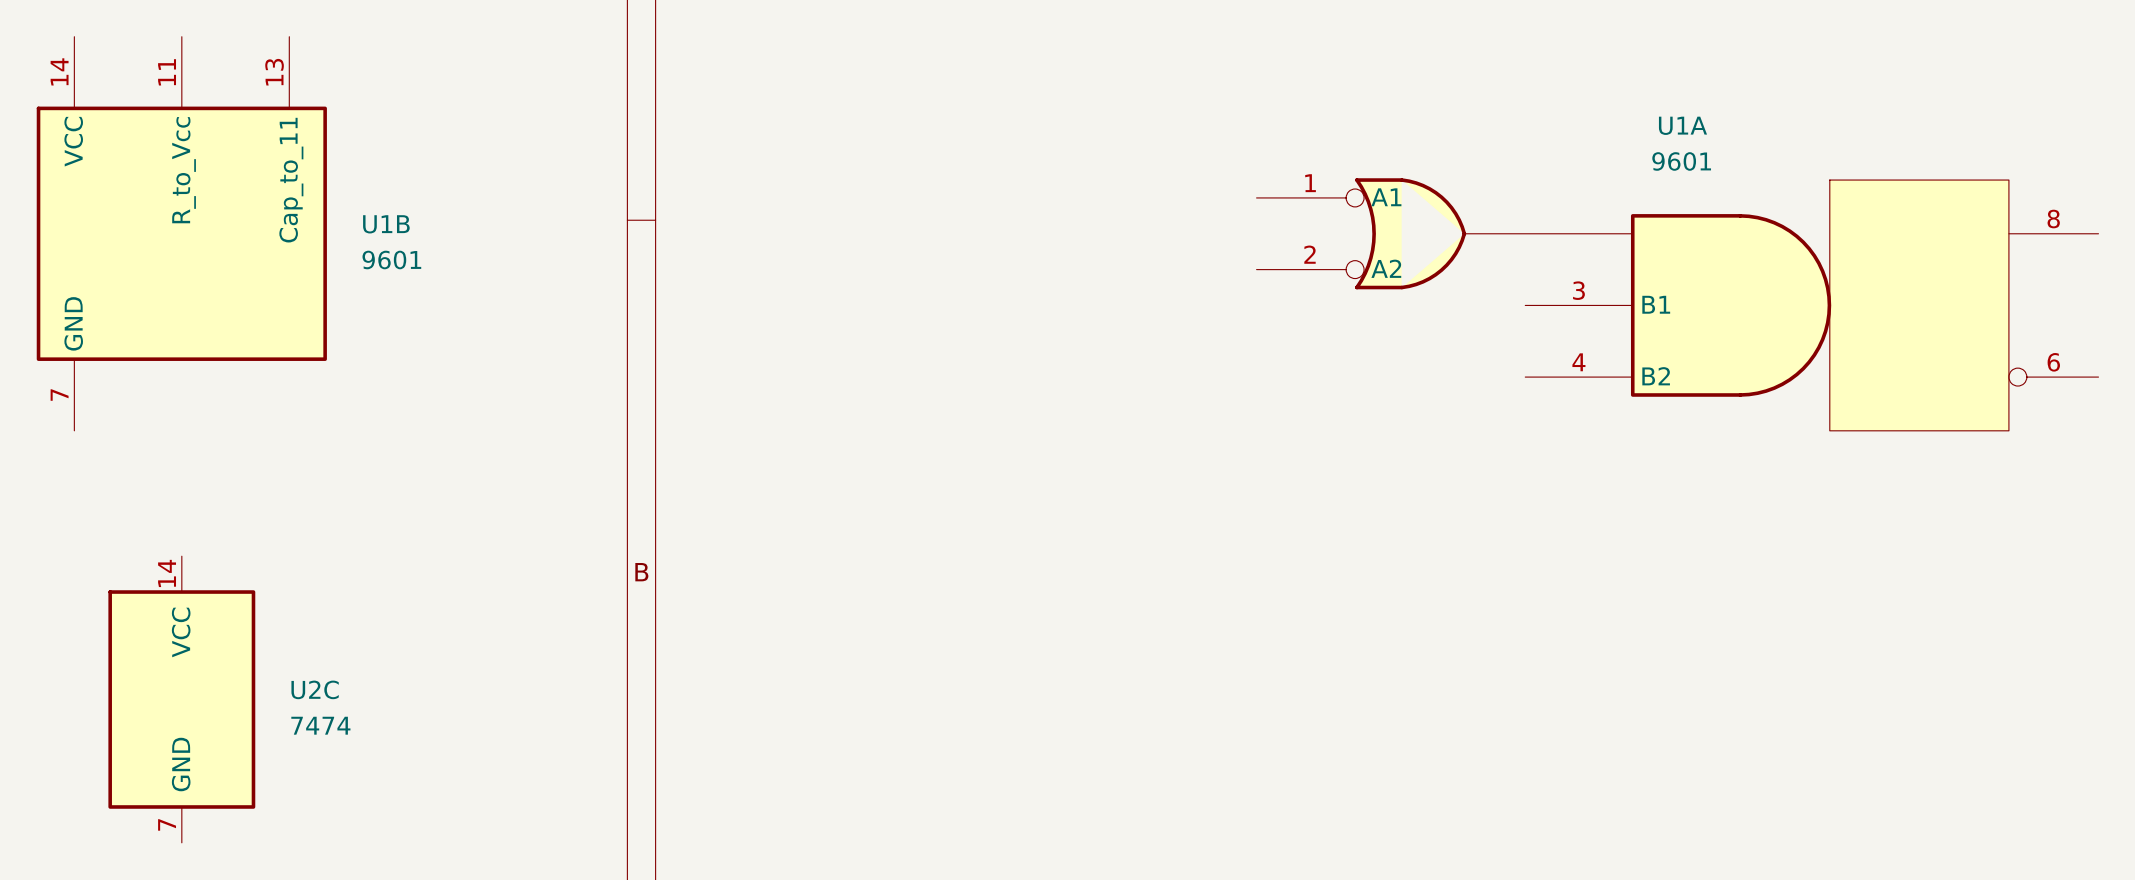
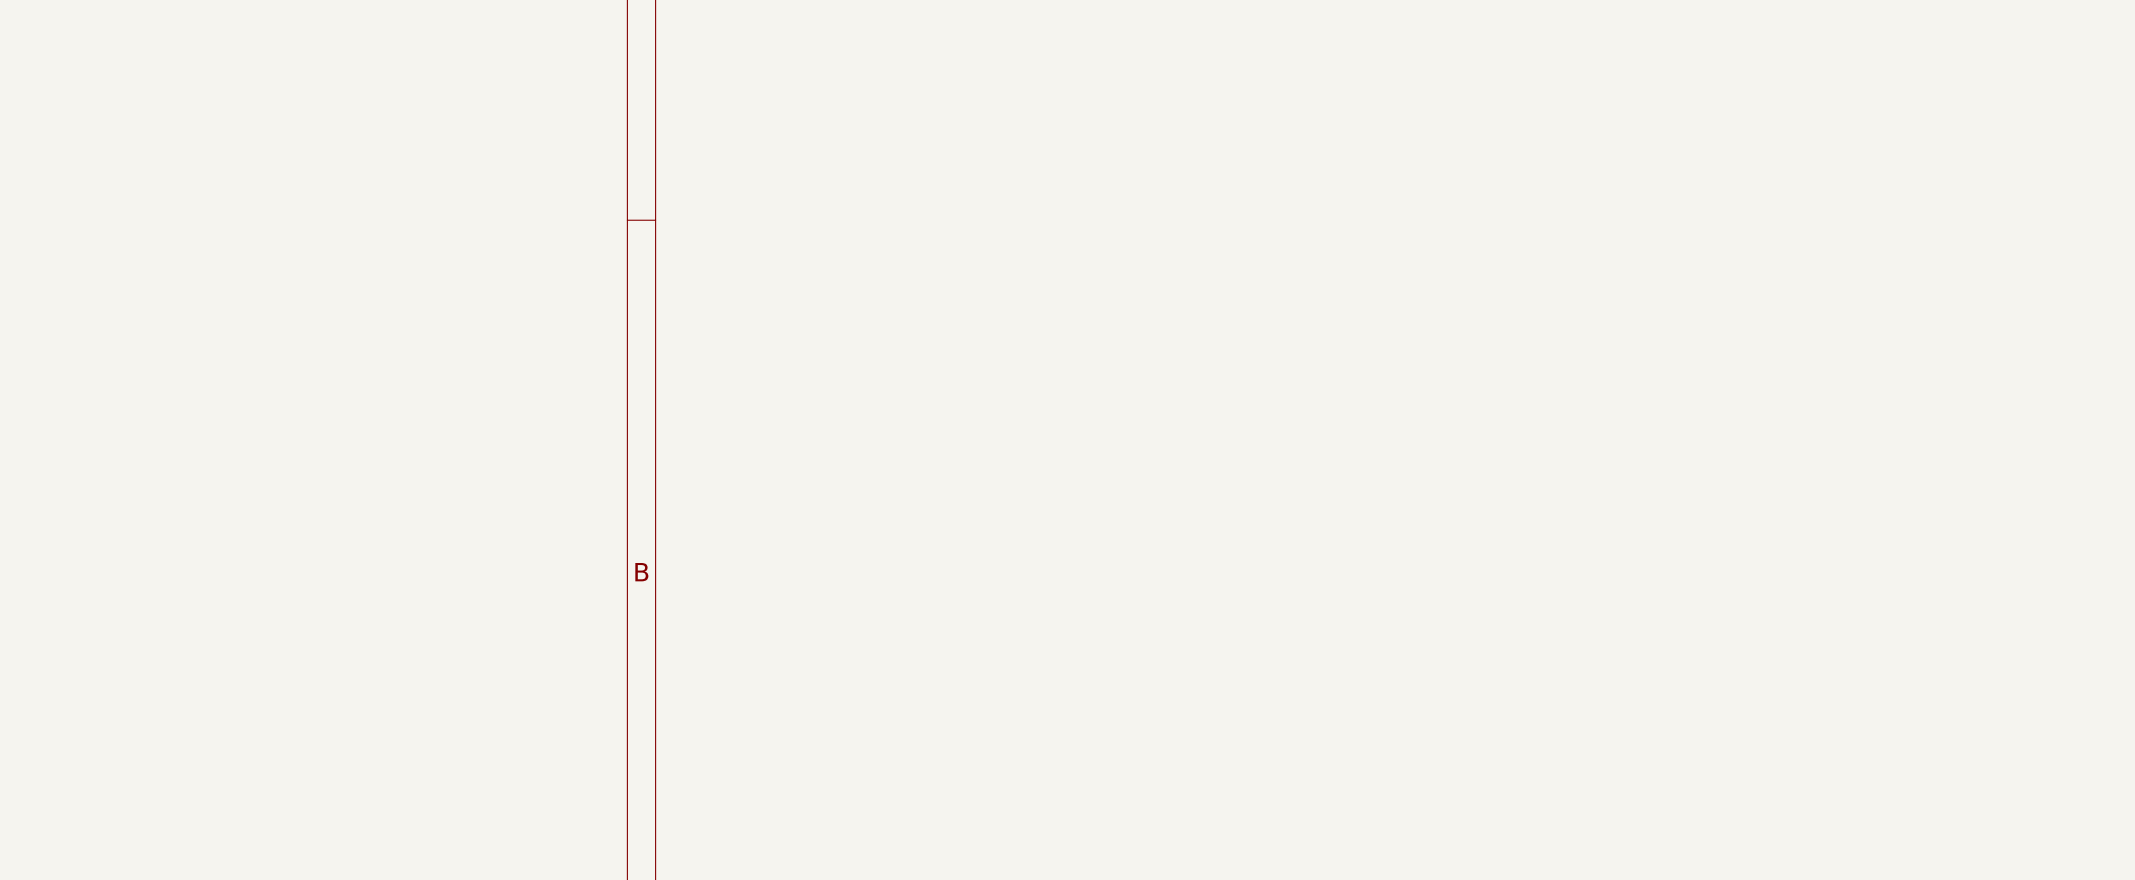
U1B: 9601 (181, 233) -> none
U1A: 9601 (1677, 304) -> none
U2C: 7474 (181, 699) -> none

